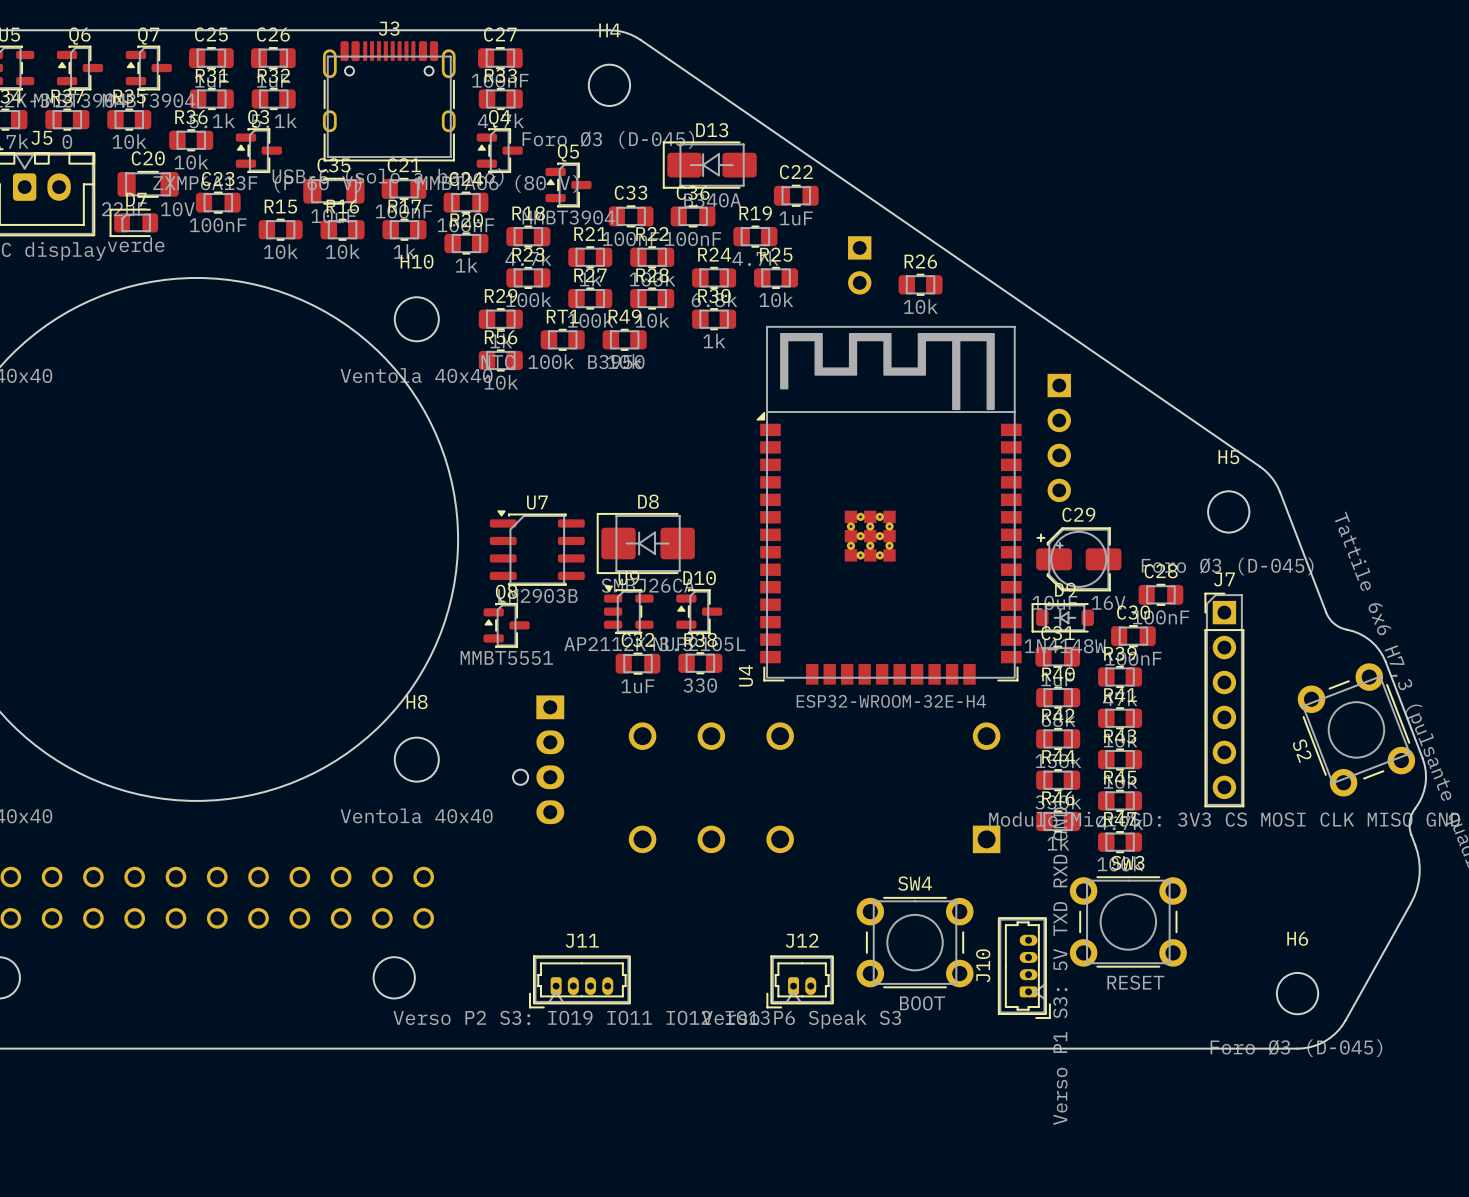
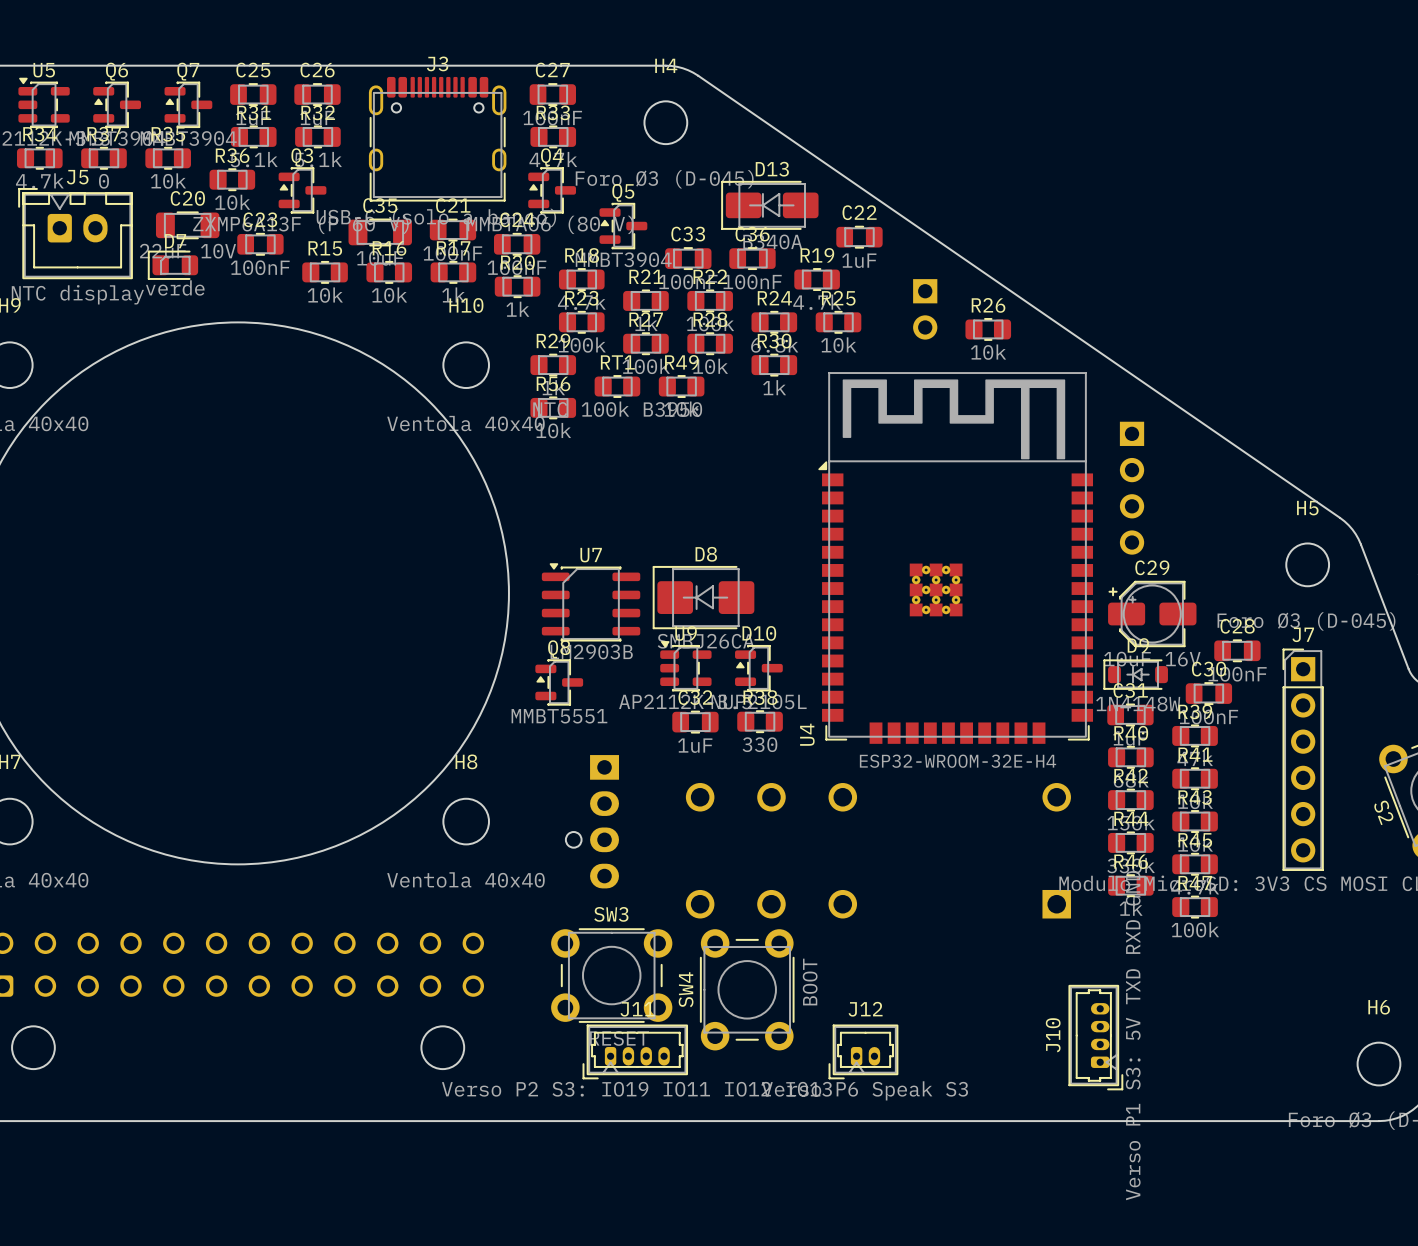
SW3 position: (1128, 921) -> (611, 975)
SW4 rotation: 0° (915, 942) -> 90° counterclockwise (747, 989)
SW4 position: (915, 942) -> (747, 989)

